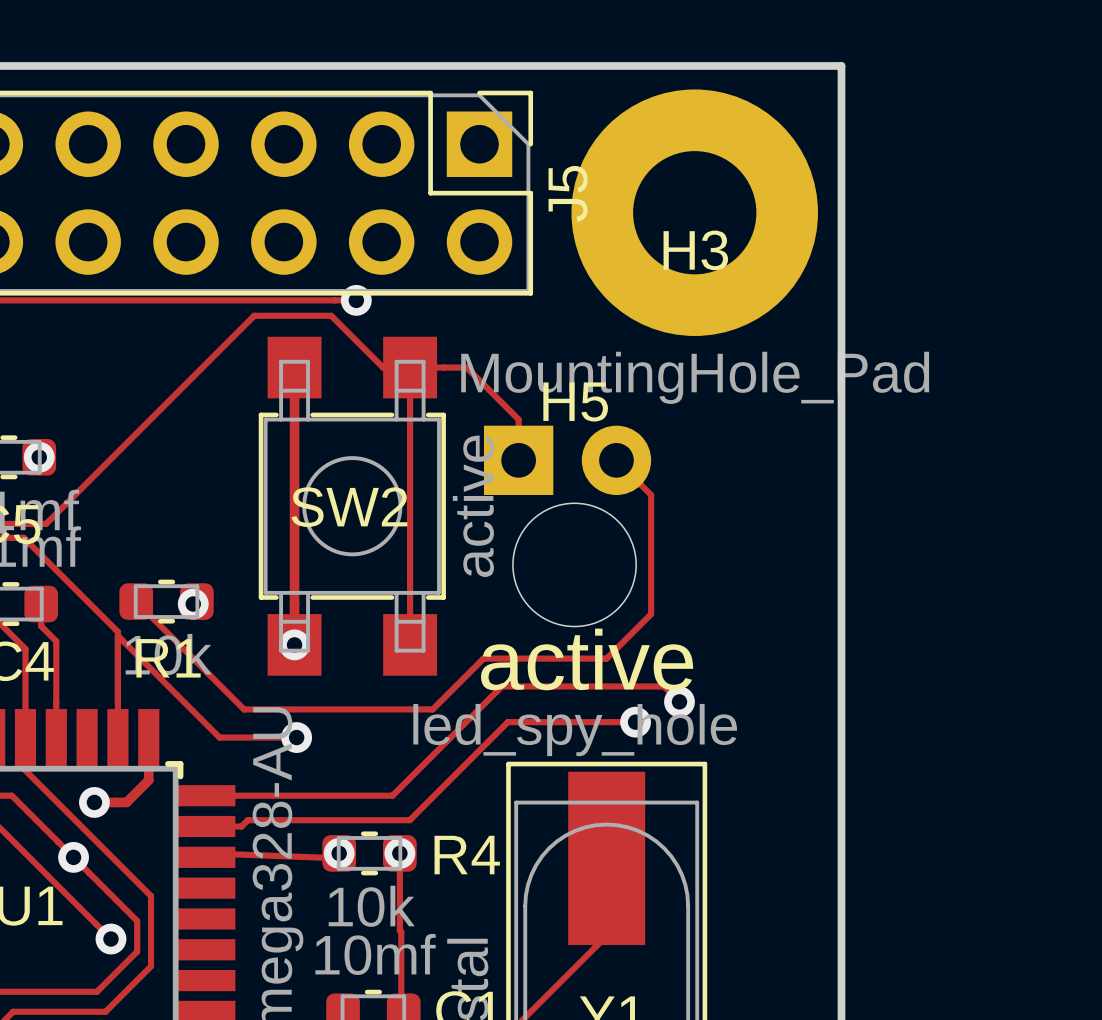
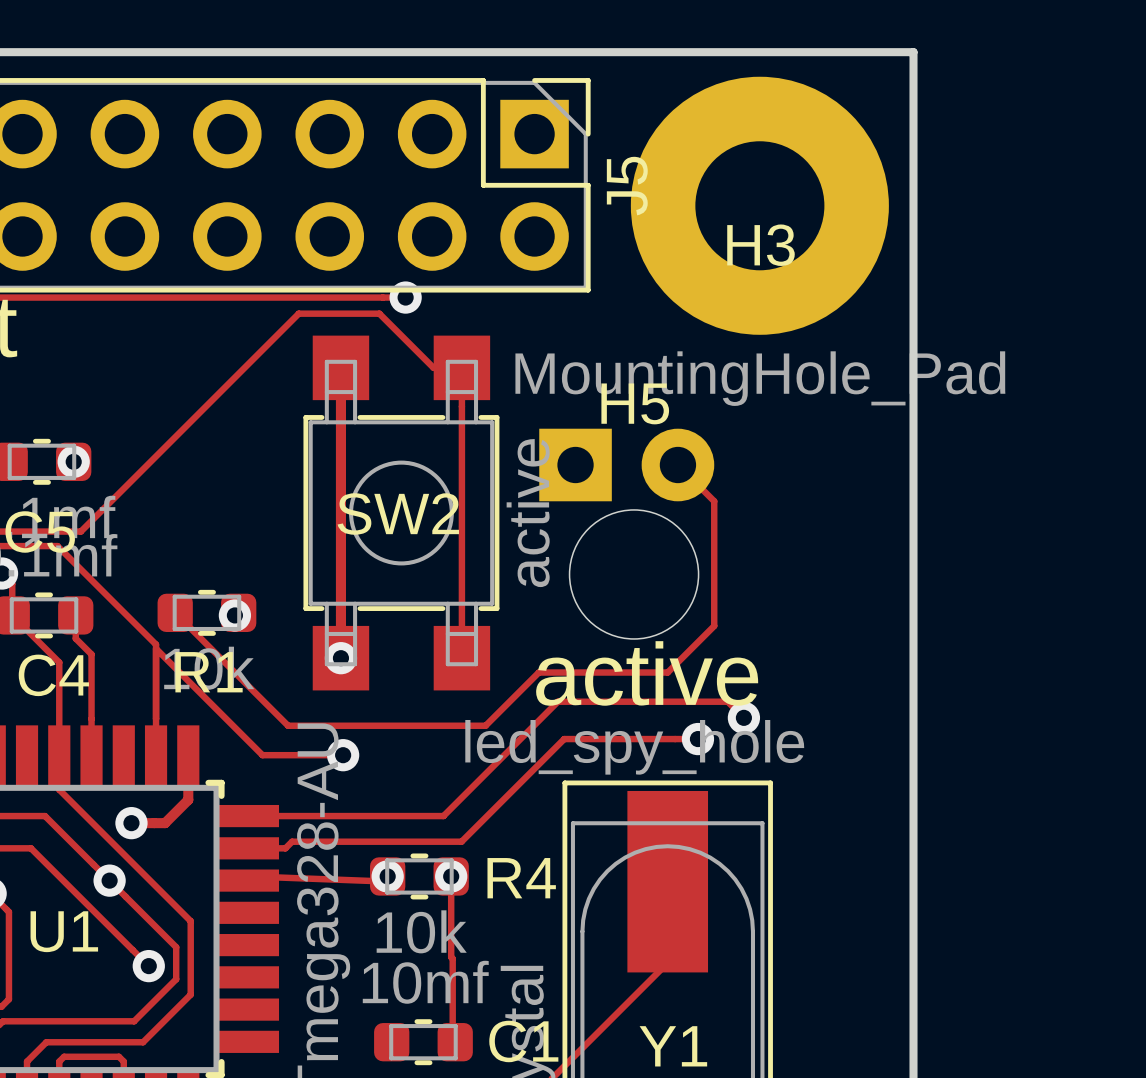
track: (410, 367) (466, 367) (518, 419) (518, 460) -> none

